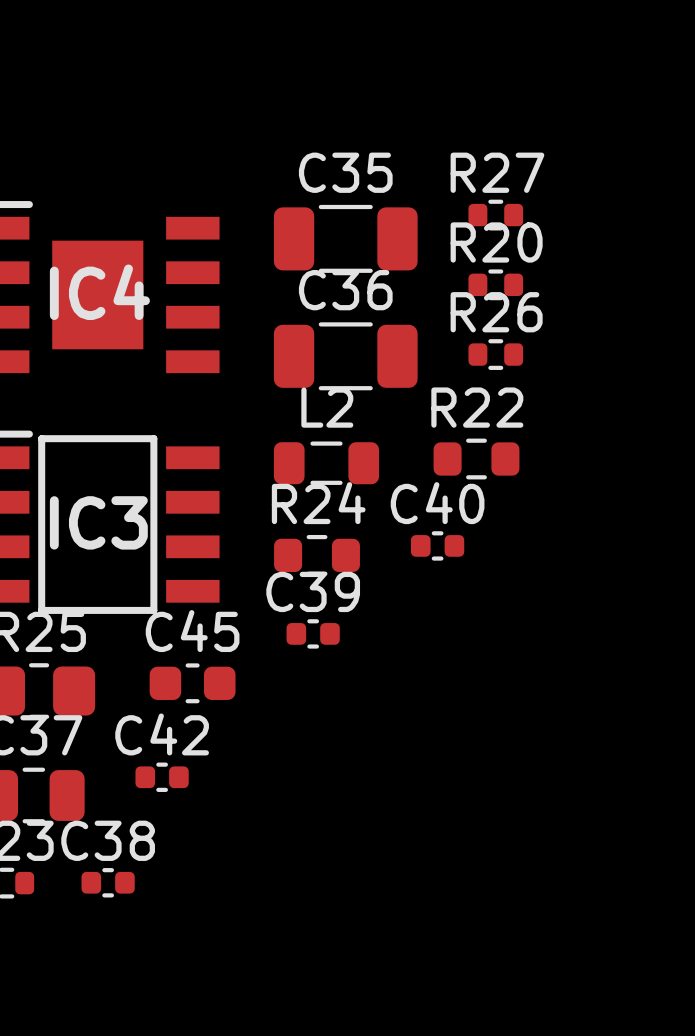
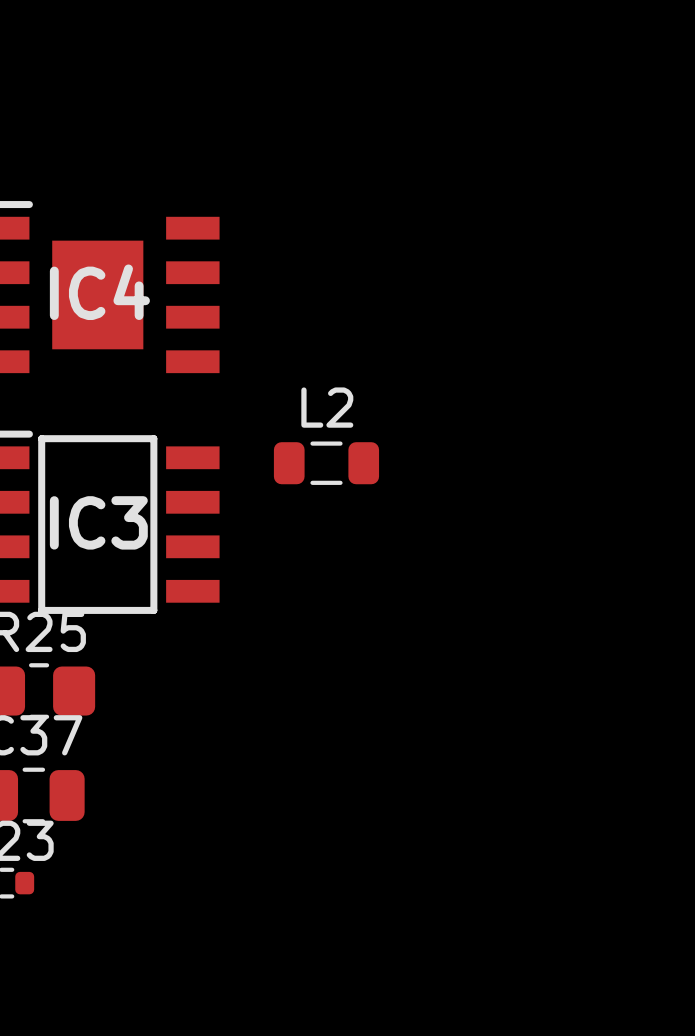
R27: (495, 215) -> none
C35: (345, 238) -> none
R20: (495, 284) -> none
R26: (495, 354) -> none
C36: (345, 356) -> none
R22: (476, 459) -> none
C40: (437, 545) -> none
R24: (317, 555) -> none
C39: (313, 633) -> none
C45: (192, 683) -> none
C42: (162, 777) -> none
C38: (108, 882) -> none

